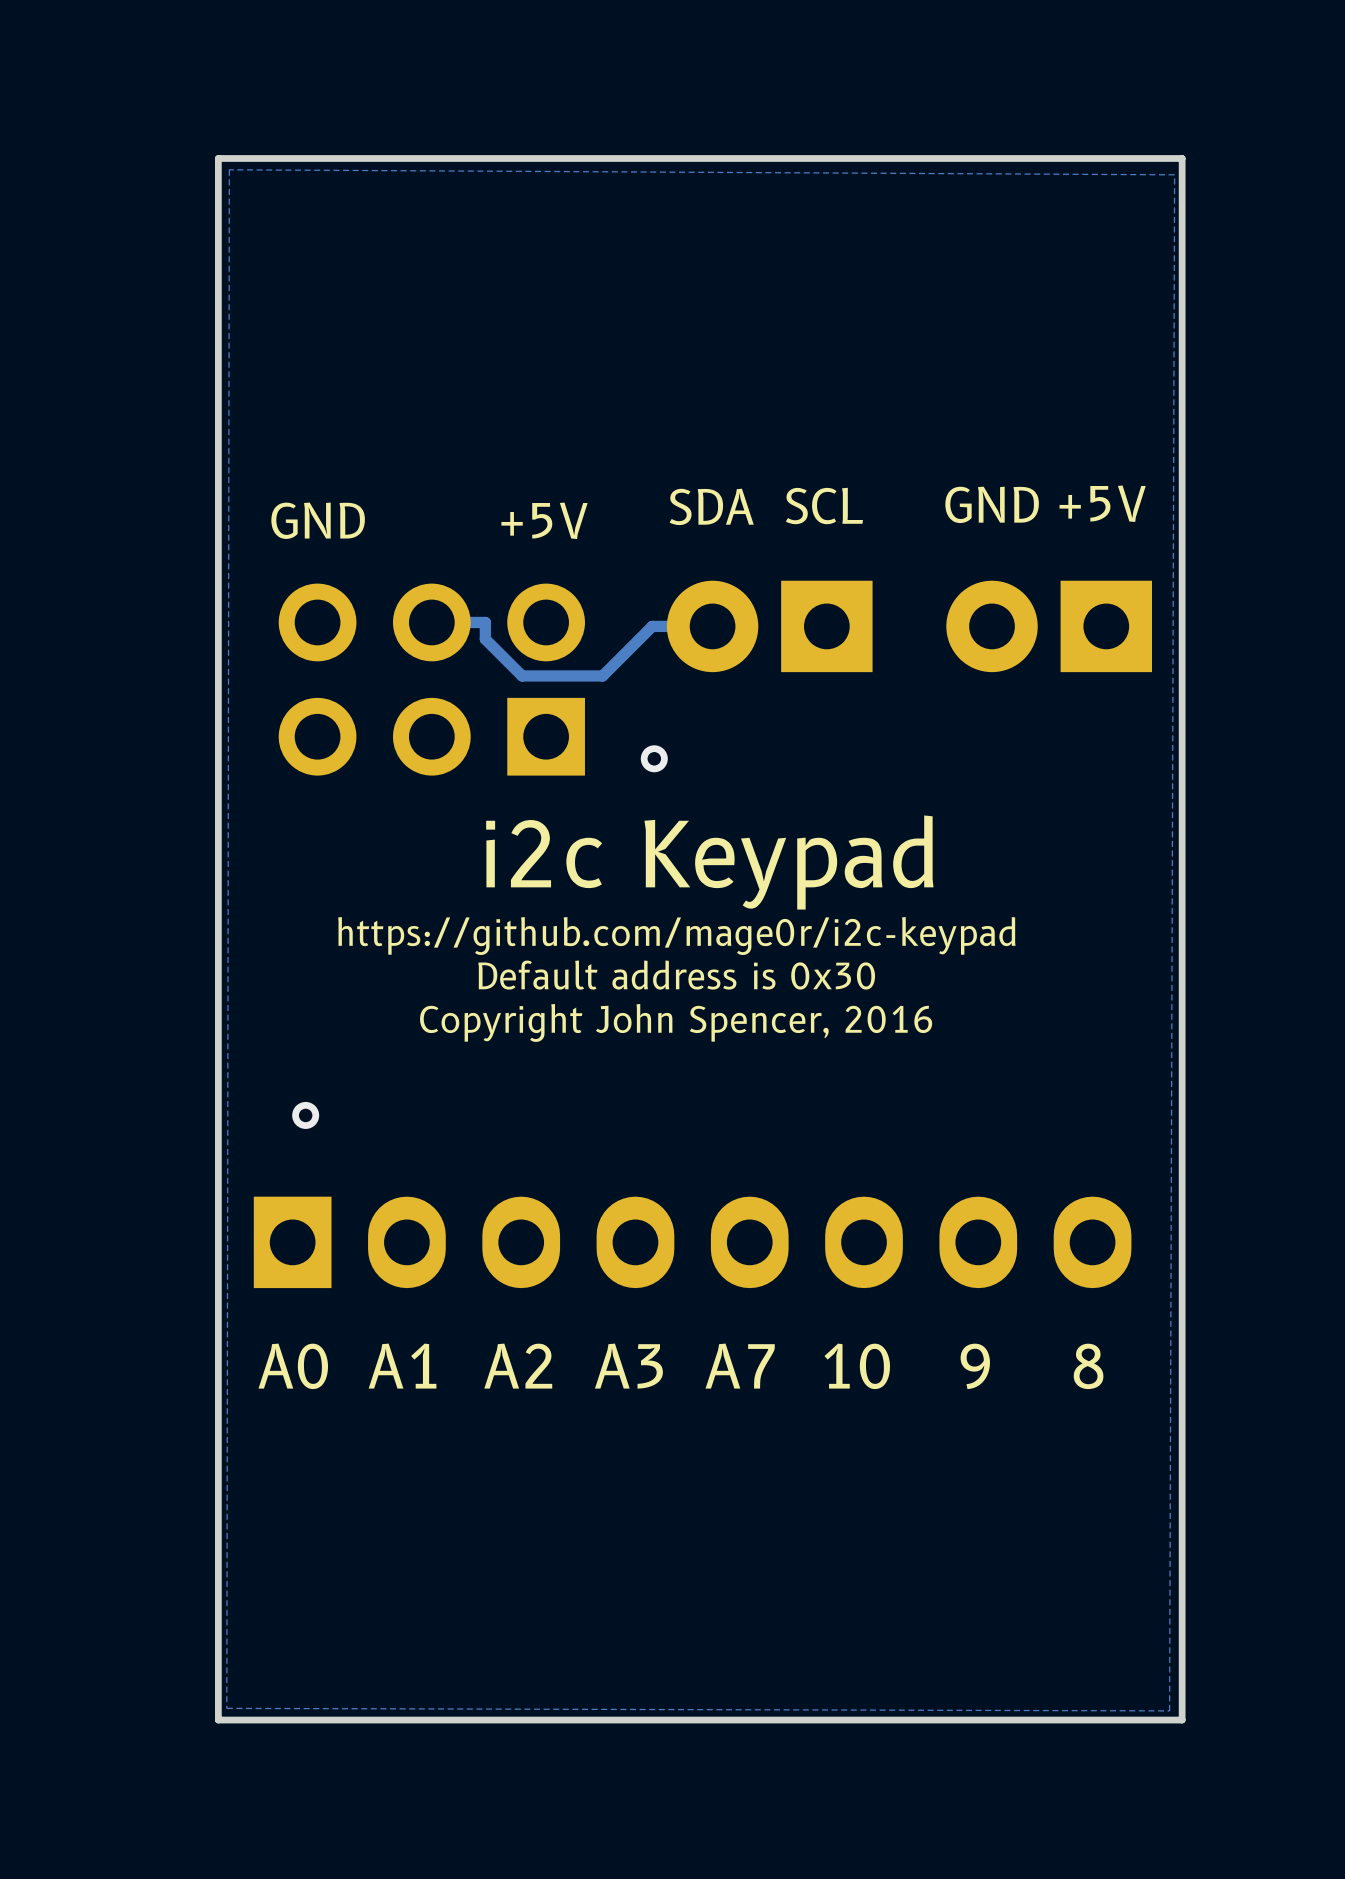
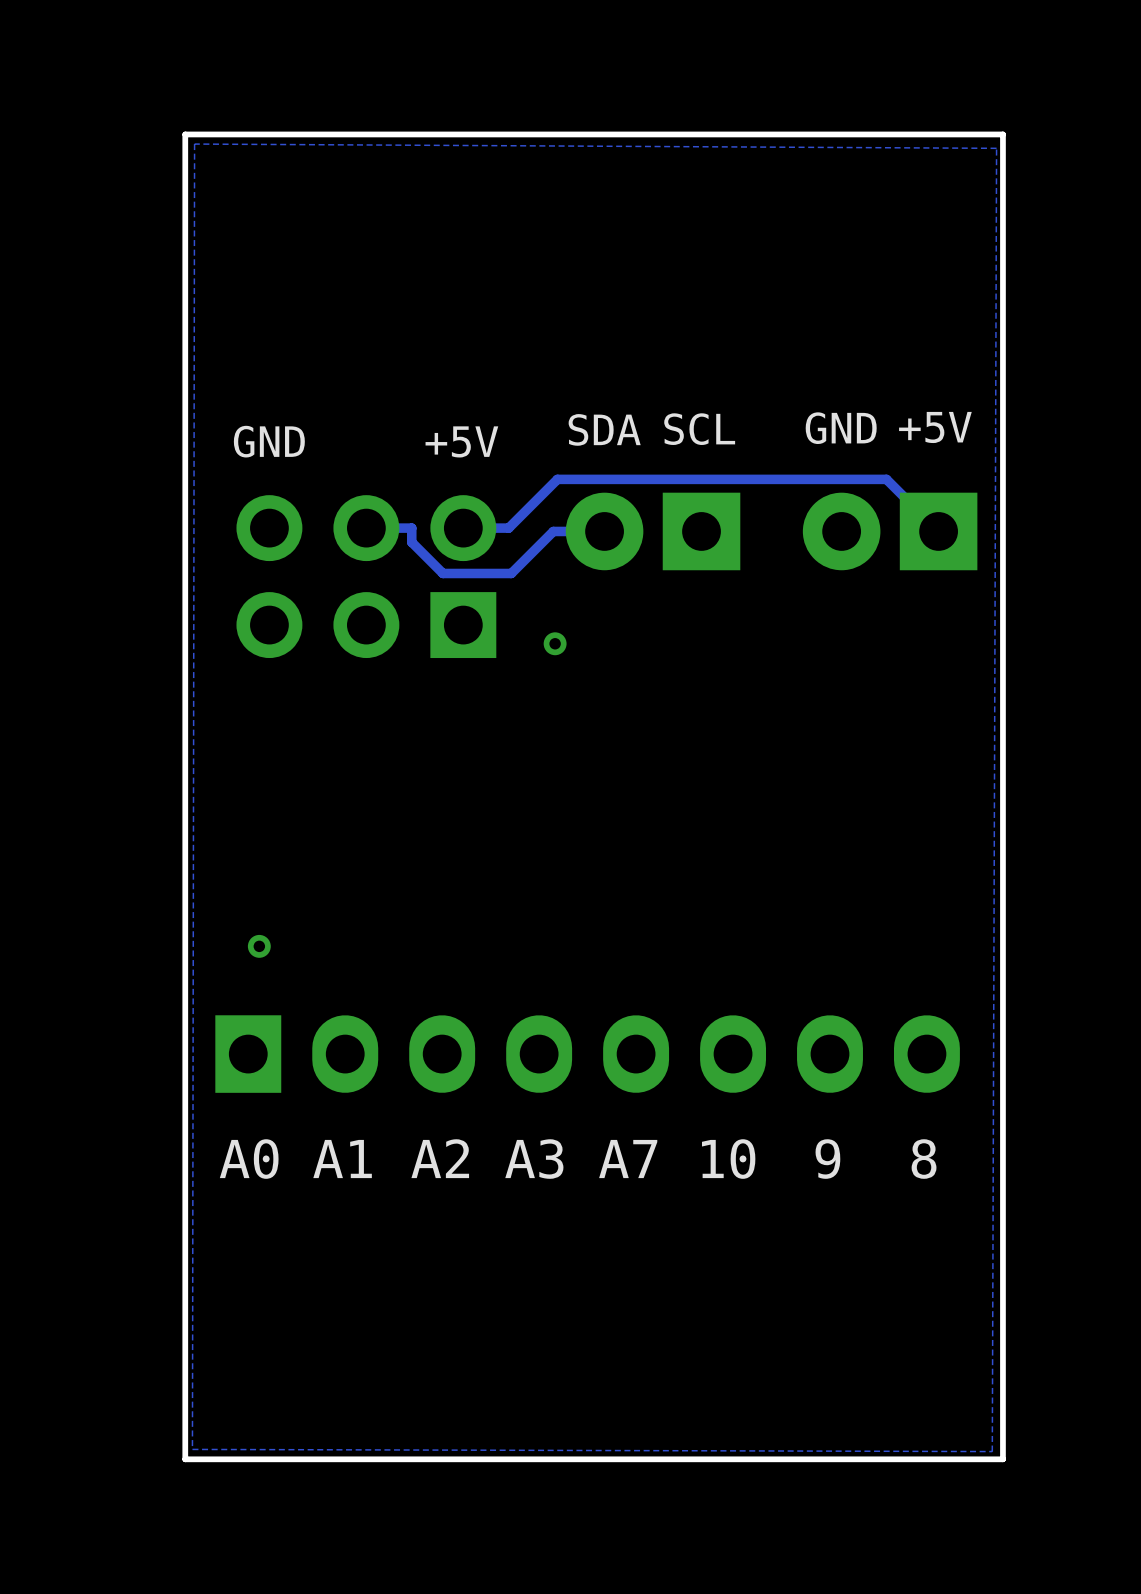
track: none -> (463, 528) (508, 528) (557, 479) (886, 479) (938, 531)
text: i2c Keypad (709, 862) -> none
text: https://github.com/mage0r/i2c-keypad (676, 936) -> none
text: Default address is 0x30 (676, 975) -> none
text: Copyright John Spencer, 2016 (676, 1022) -> none

